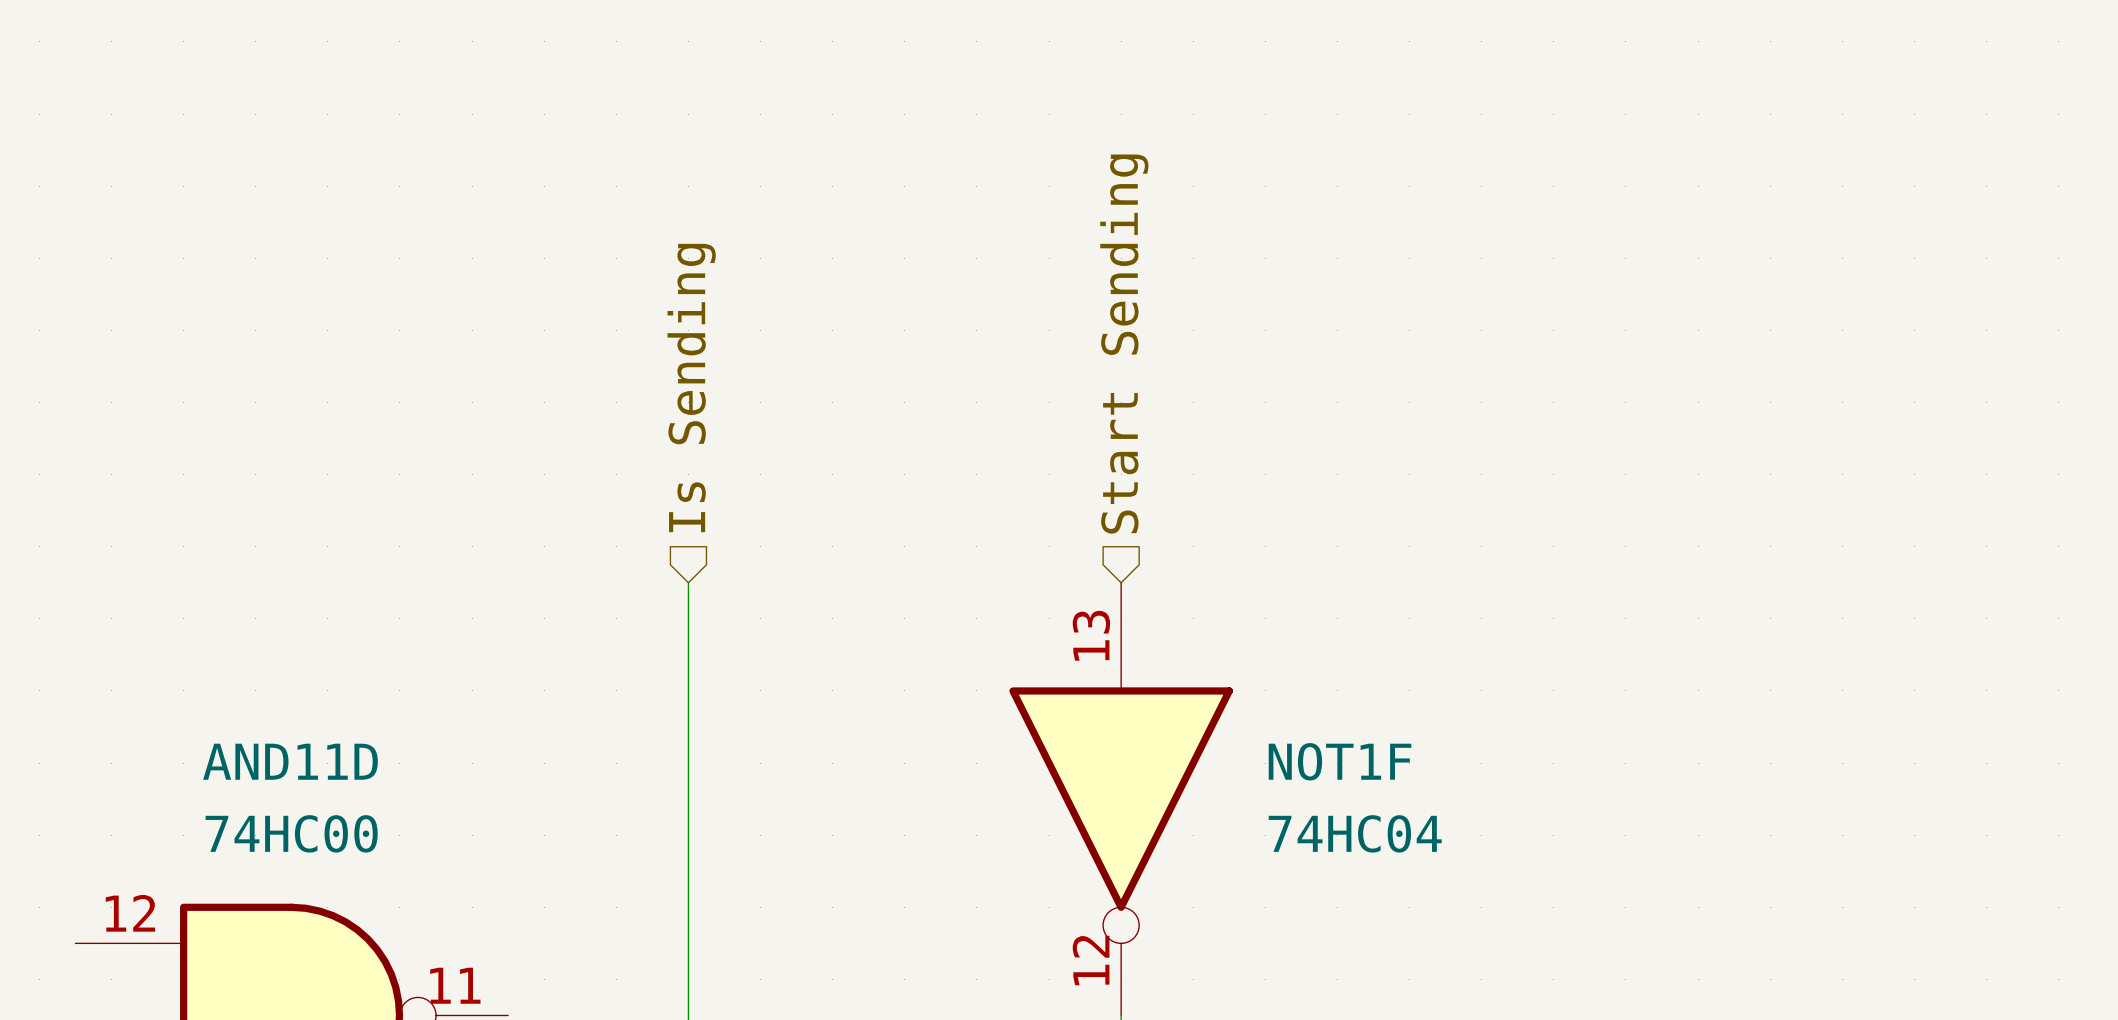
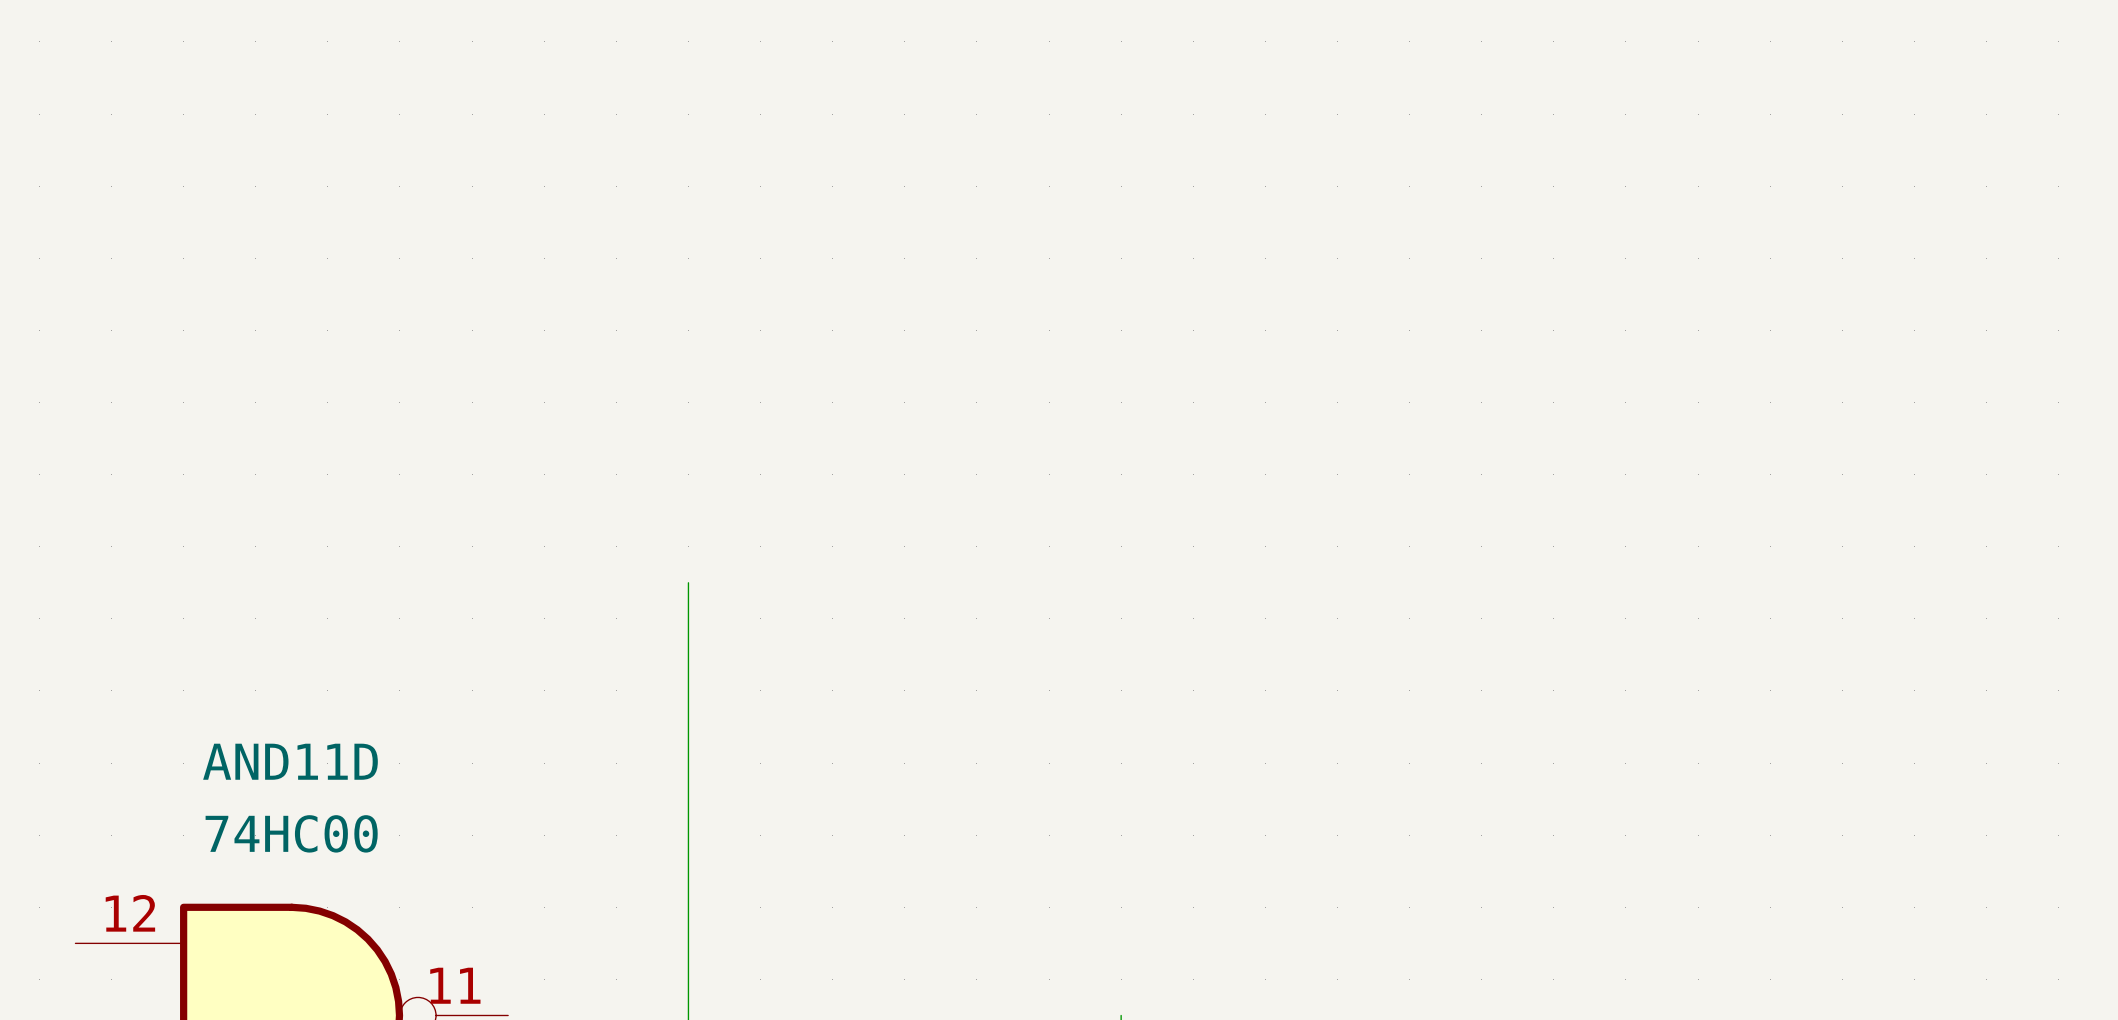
hierarchical label: Start Sending (1124, 344) -> none
hierarchical label: Is Sending (691, 388) -> none
NOT1F: 74HC04 (1121, 799) -> none

